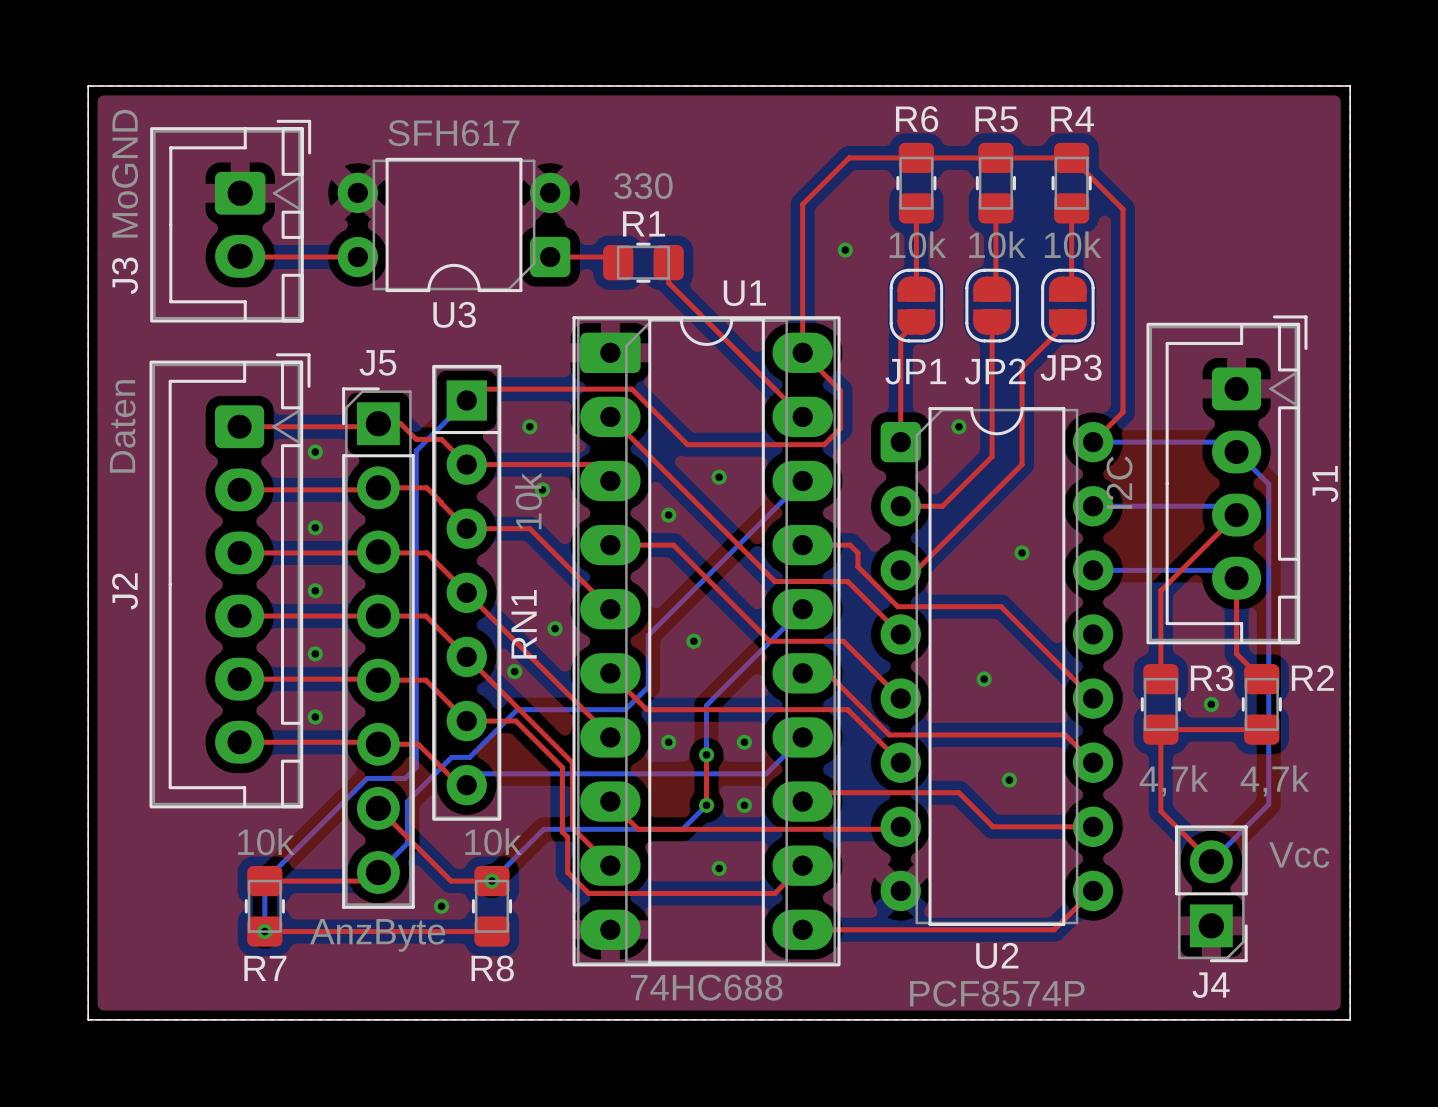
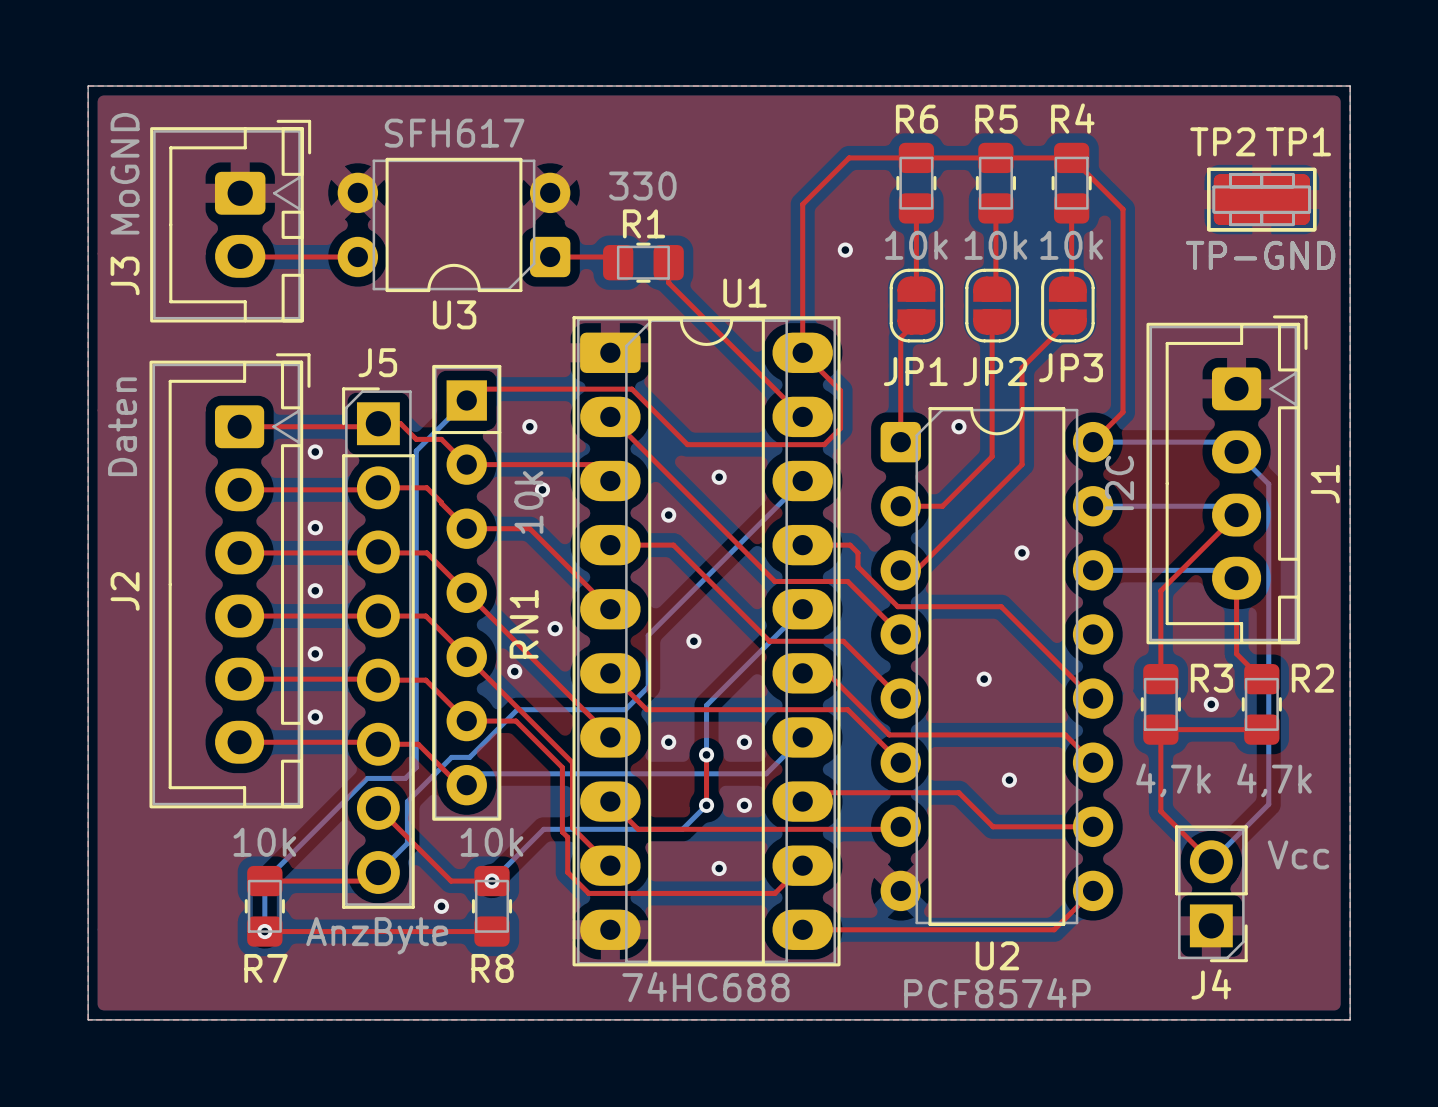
TP1: none -> TP-GND (1261, 199)
TP2: none -> TP-GND (1261, 199)

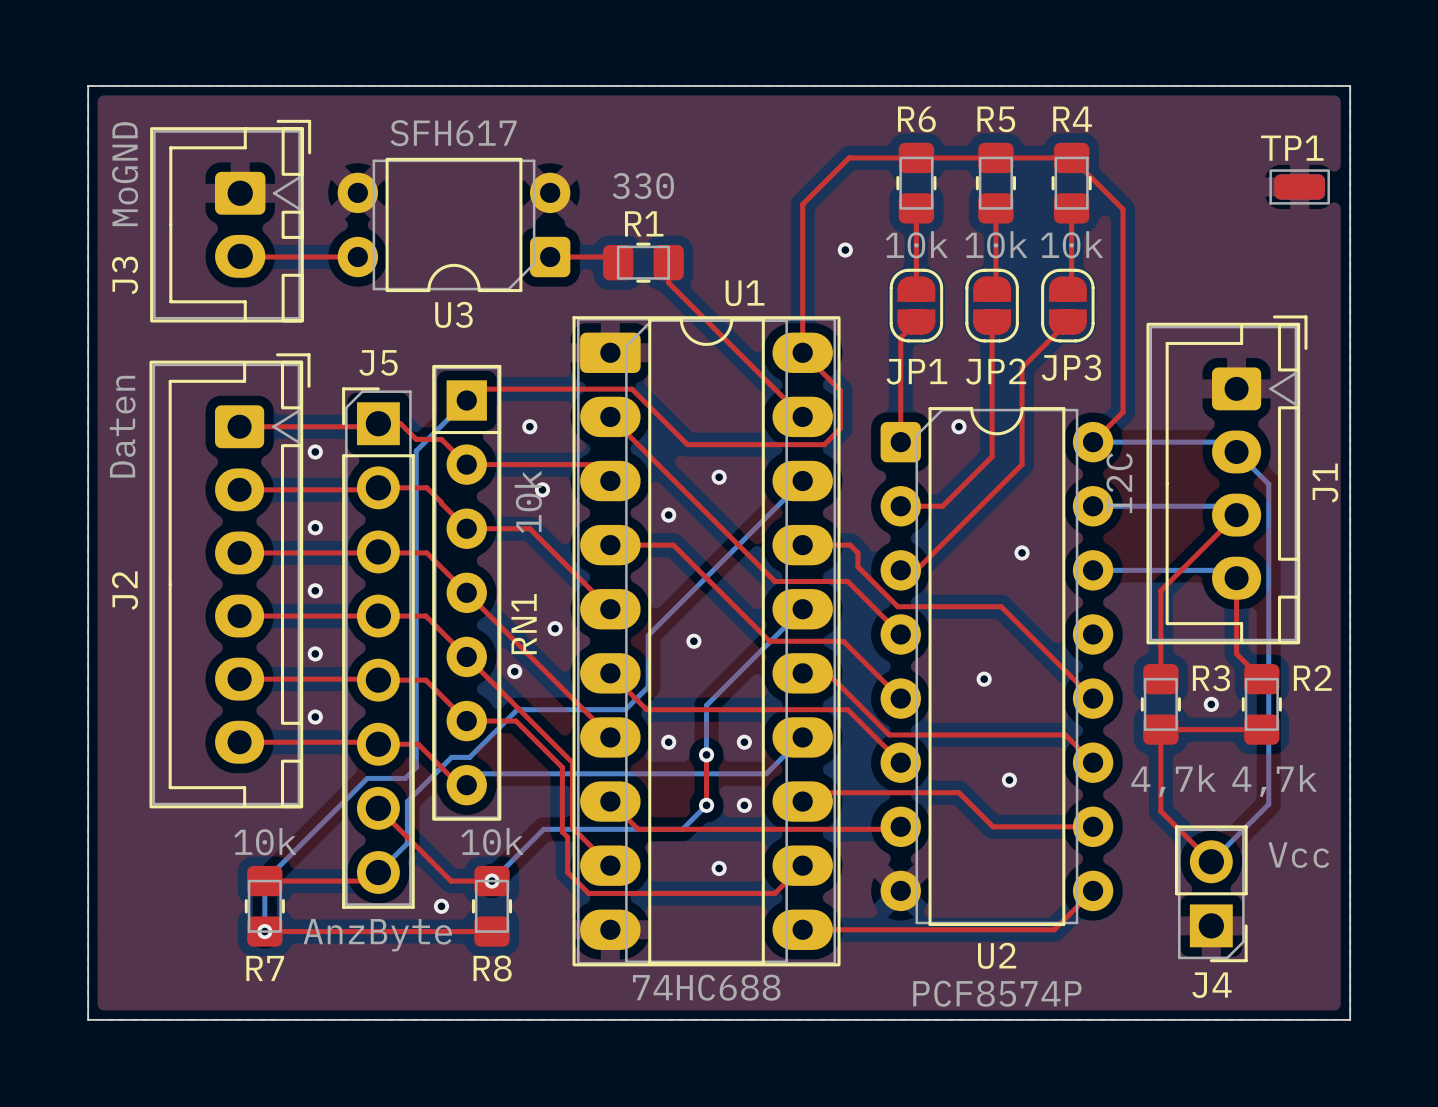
TP1 footprint: [1207, 167, 1317, 232] -> [1269, 169, 1330, 205]
TP2: TP-GND (1261, 199) -> none
TP1 value: TP-GND (1260, 255) -> none

